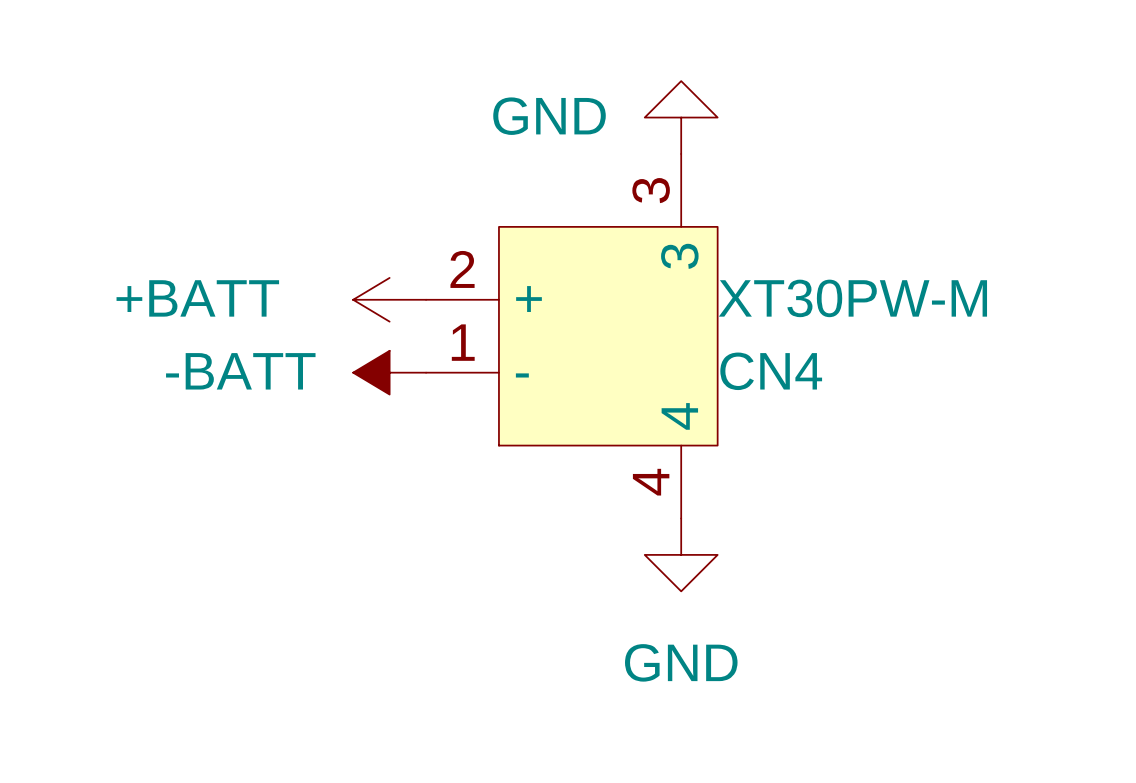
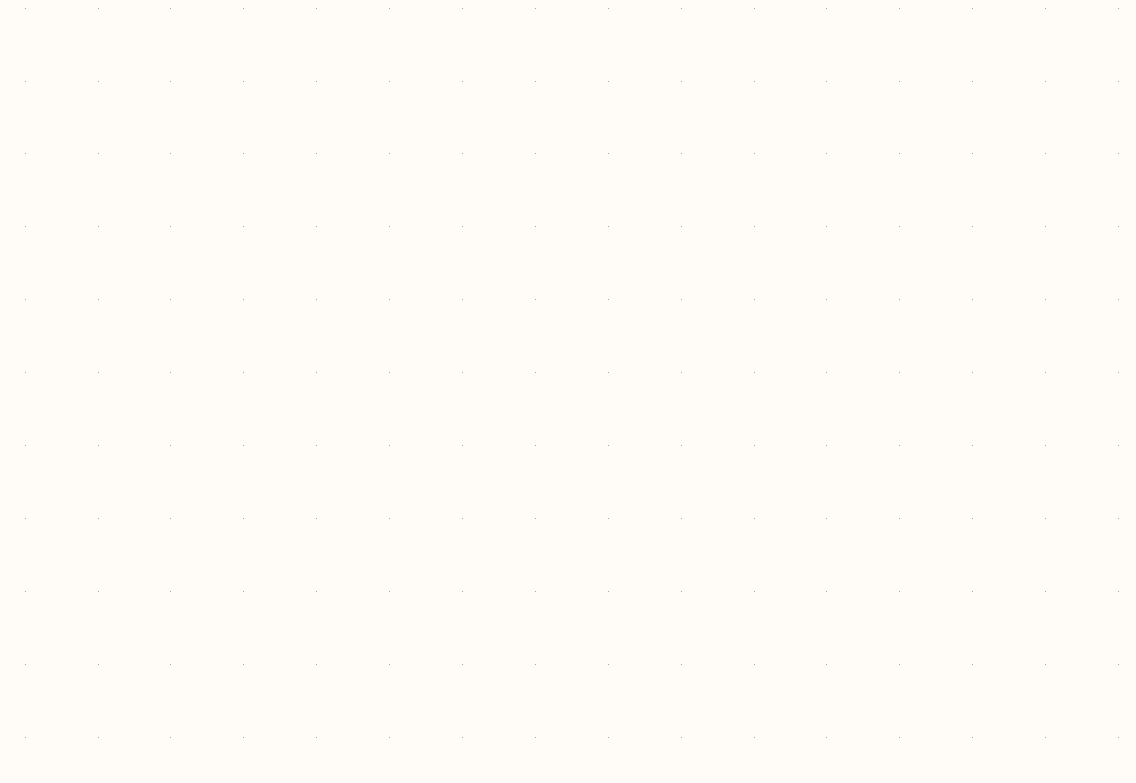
power symbol: GND (681, 117) -> none
power symbol: +BATT (389, 299) -> none
CN4: XT30PW-M (571, 336) -> none
power symbol: -BATT (389, 372) -> none
power symbol: GND (681, 554) -> none

